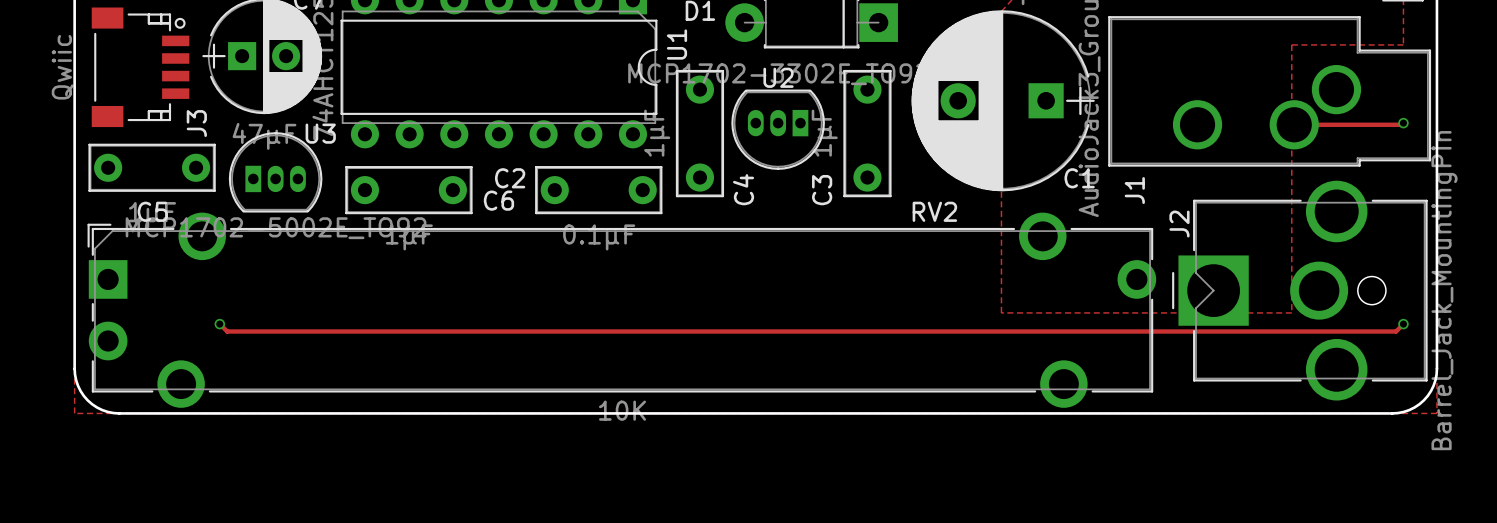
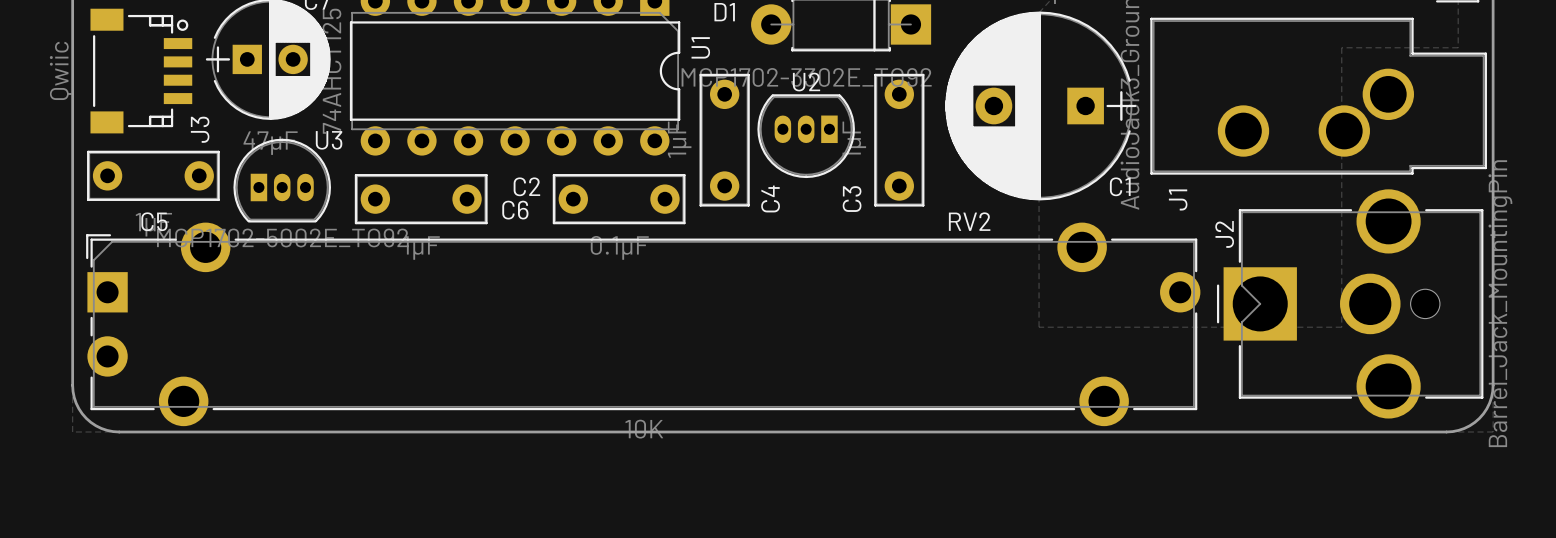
track: (1403, 123) (1401, 124) (1294, 124) -> none
via: (1403, 123) -> none
track: (219, 324) (227, 331) (1396, 331) (1403, 324) -> none
via: (219, 324) -> none
via: (1403, 324) -> none

